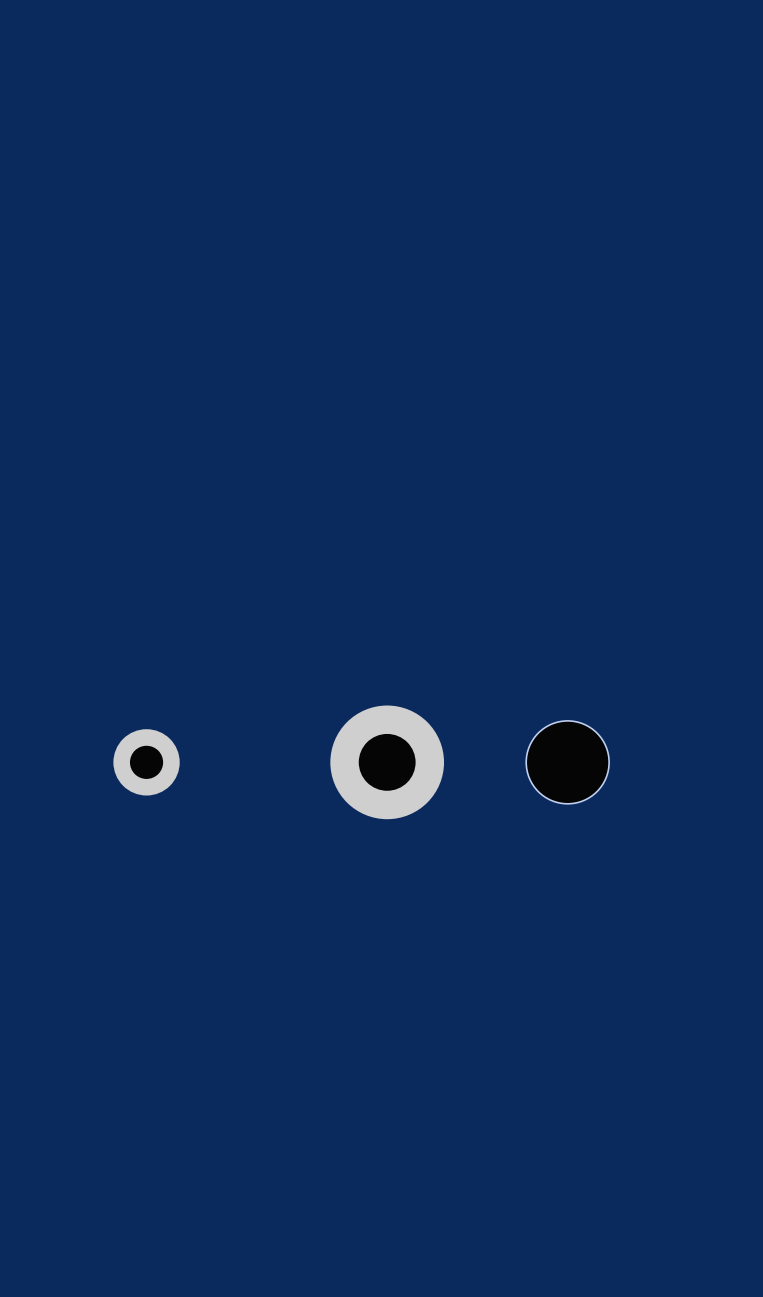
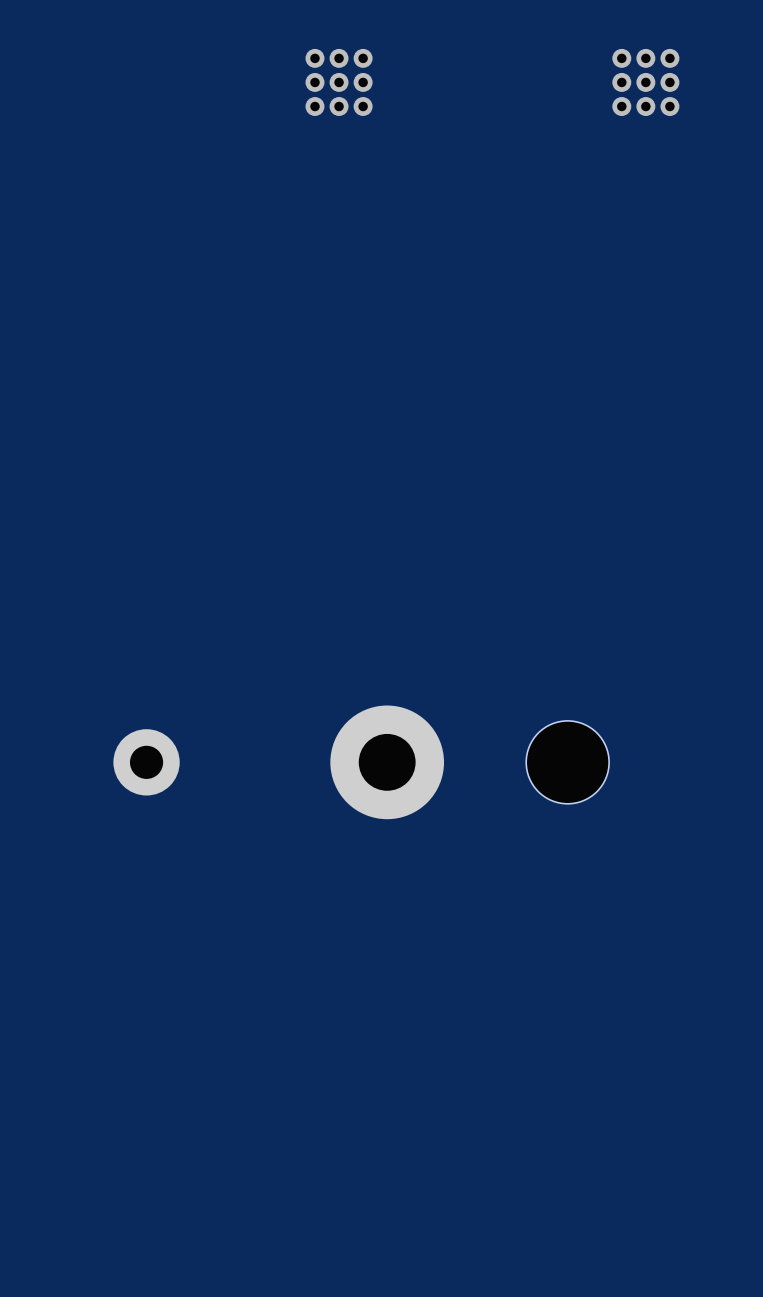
via: none -> (314, 58)
via: none -> (339, 58)
via: none -> (363, 58)
via: none -> (621, 58)
via: none -> (645, 58)
via: none -> (669, 58)
via: none -> (314, 82)
via: none -> (339, 82)
via: none -> (363, 82)
via: none -> (621, 82)
via: none -> (645, 82)
via: none -> (669, 82)
via: none -> (314, 106)
via: none -> (339, 106)
via: none -> (363, 106)
via: none -> (621, 106)
via: none -> (645, 106)
via: none -> (669, 106)

